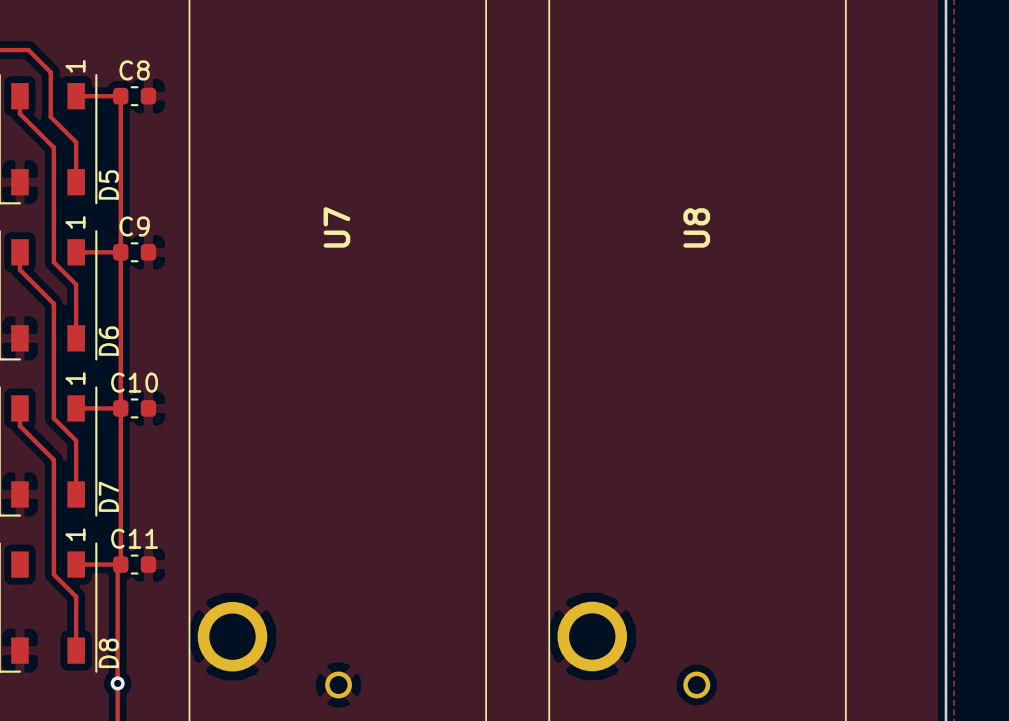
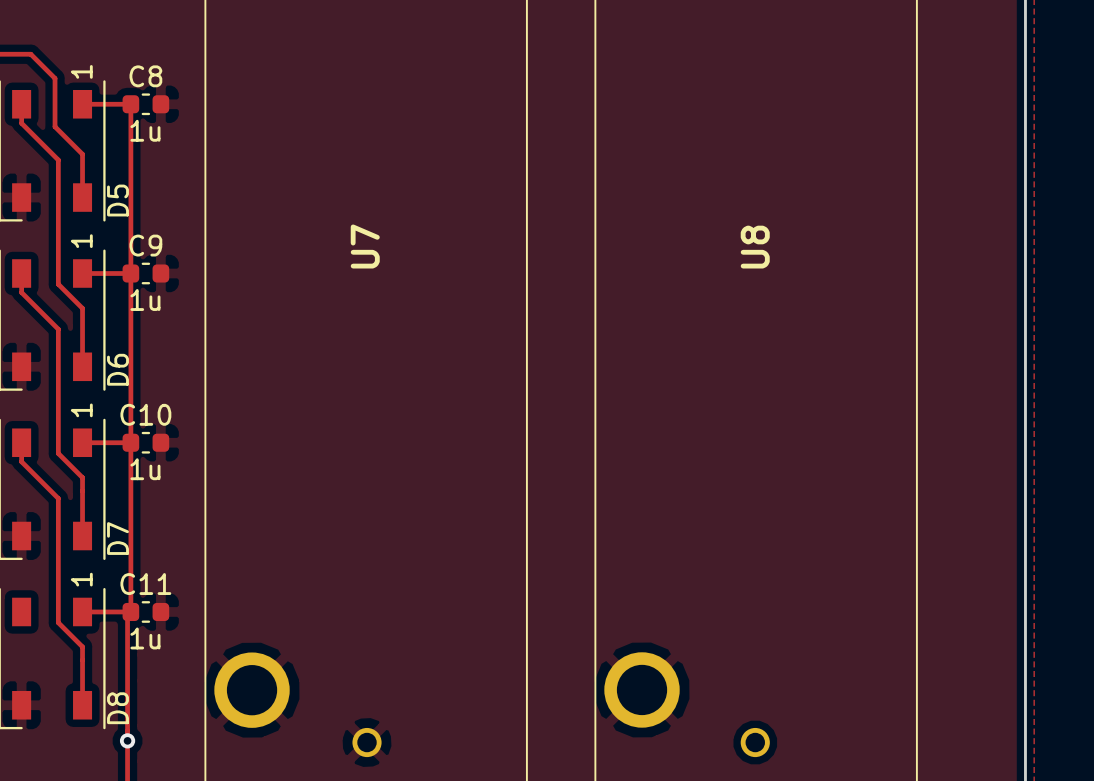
C8 value: none -> 1u (145, 130)
C9 value: none -> 1u (145, 300)
C10 value: none -> 1u (145, 469)
C11 value: none -> 1u (145, 638)

